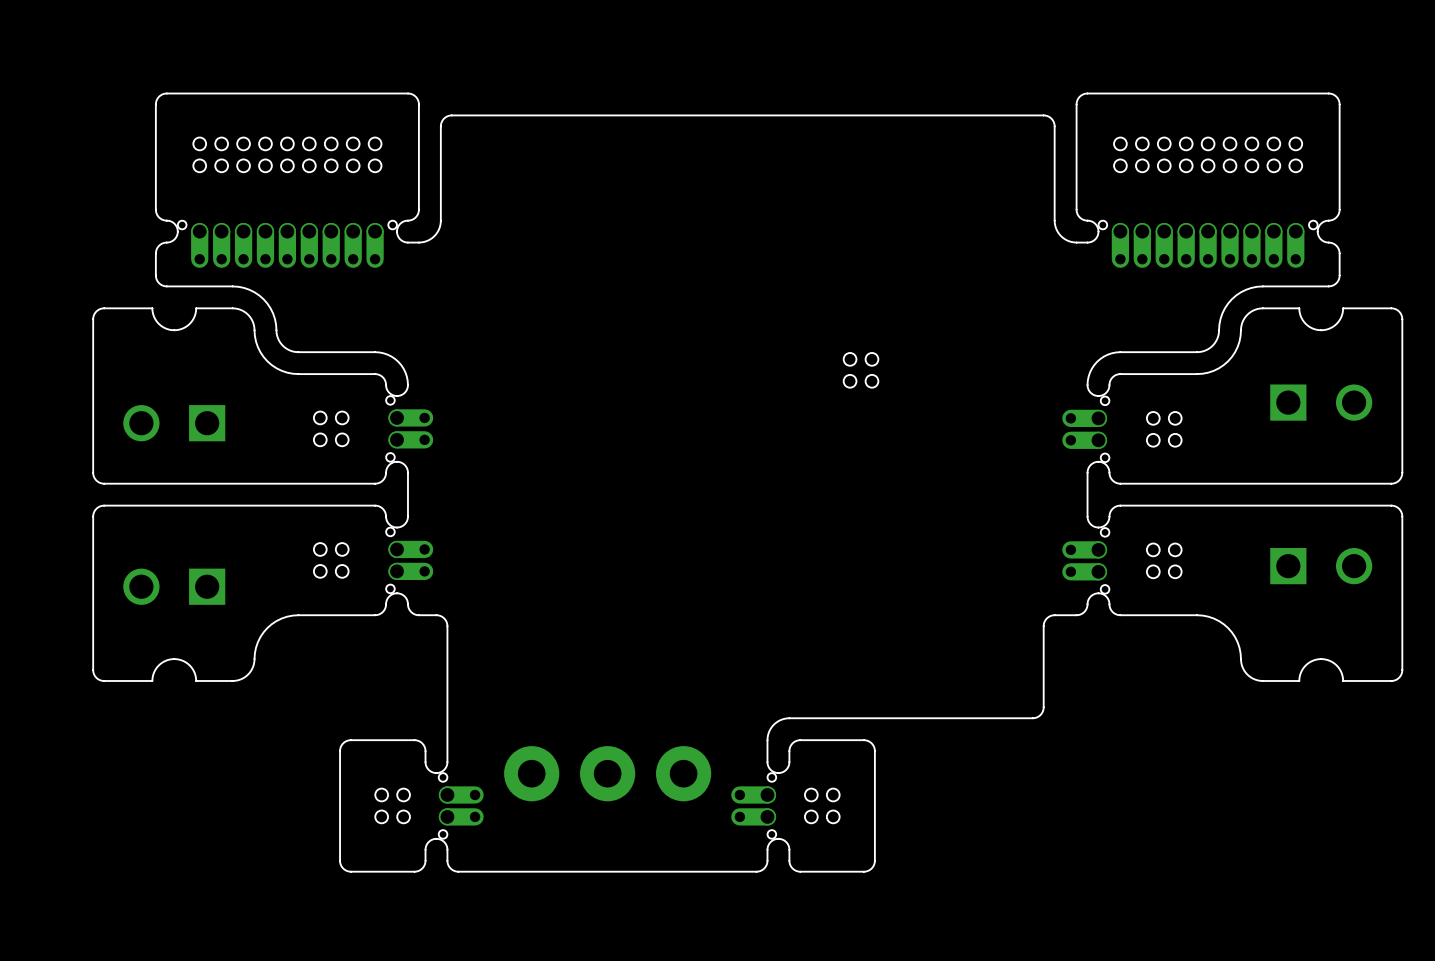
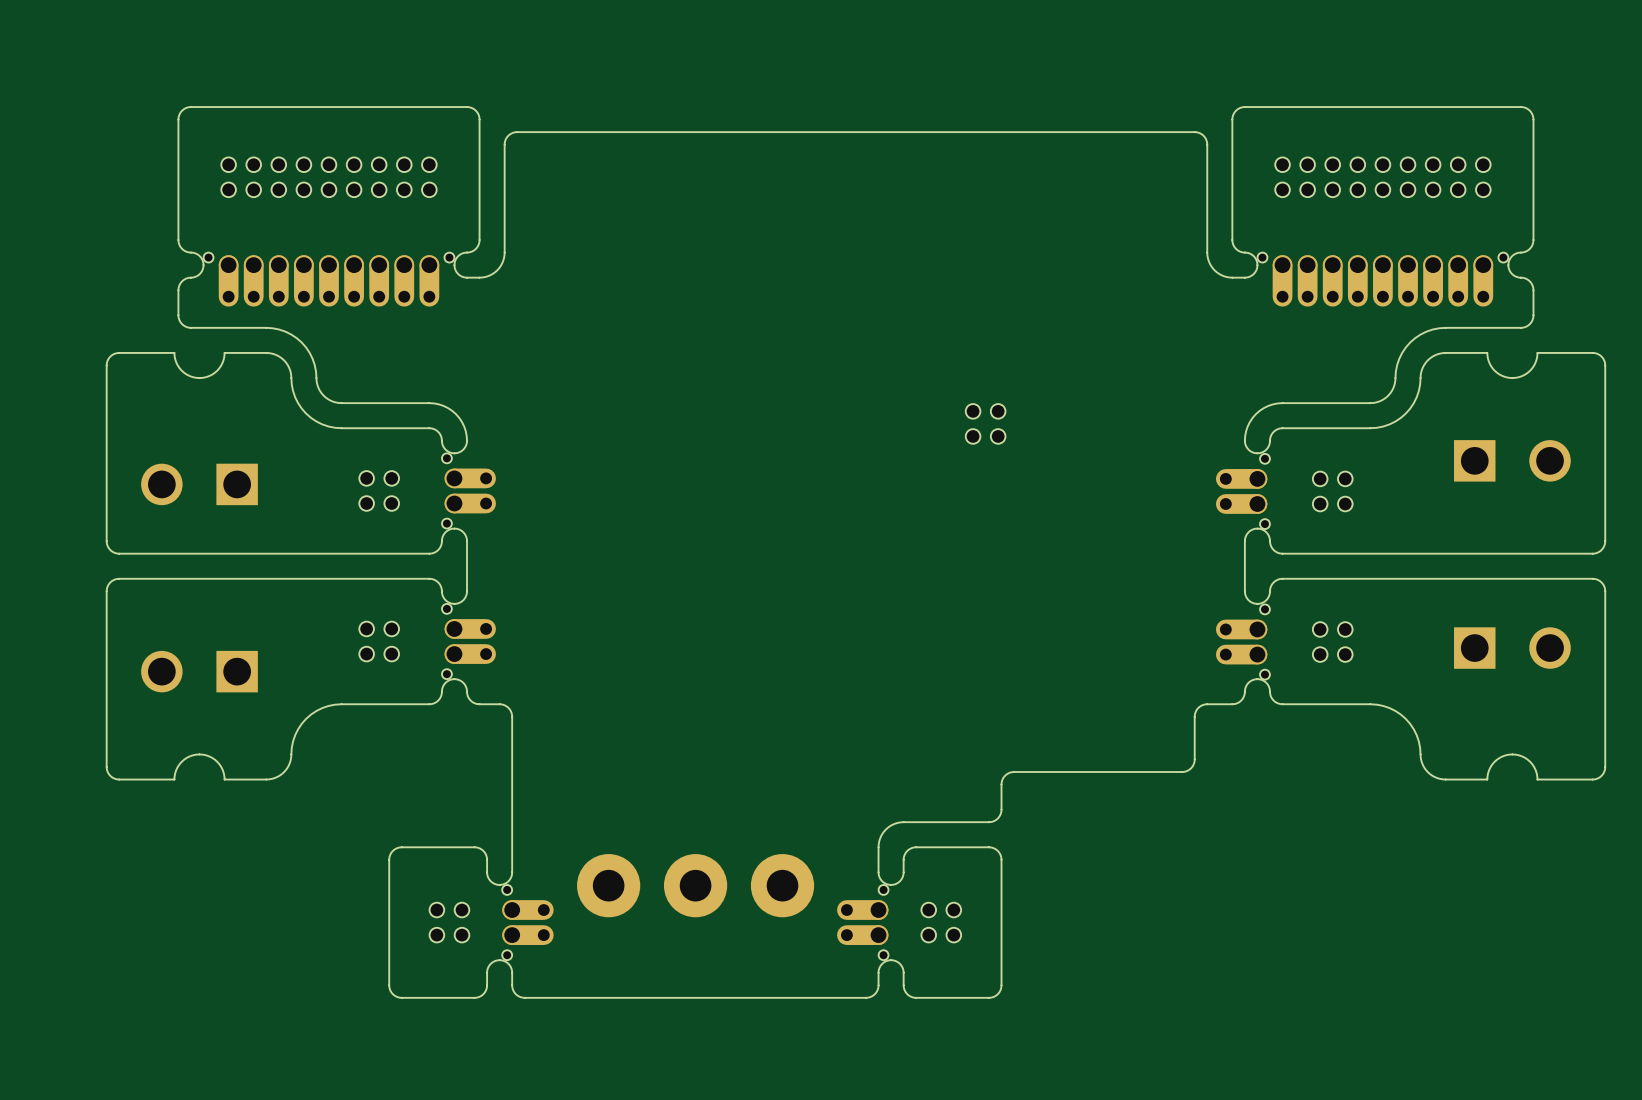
board edge: (1043, 663) (1043, 708) (1041, 714) (1036, 717) (863, 718) -> (1194, 759) (1191, 767) (1183, 771) (1009, 772) (1005, 775) (1001, 781) (1000, 815) (995, 820) (988, 822)

